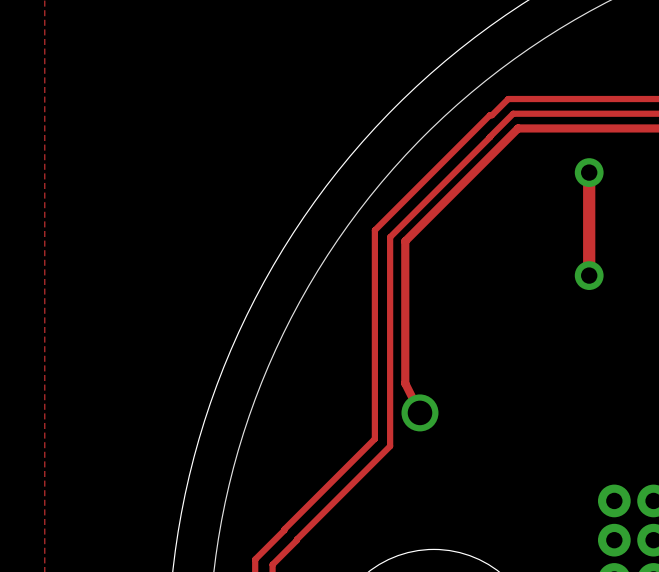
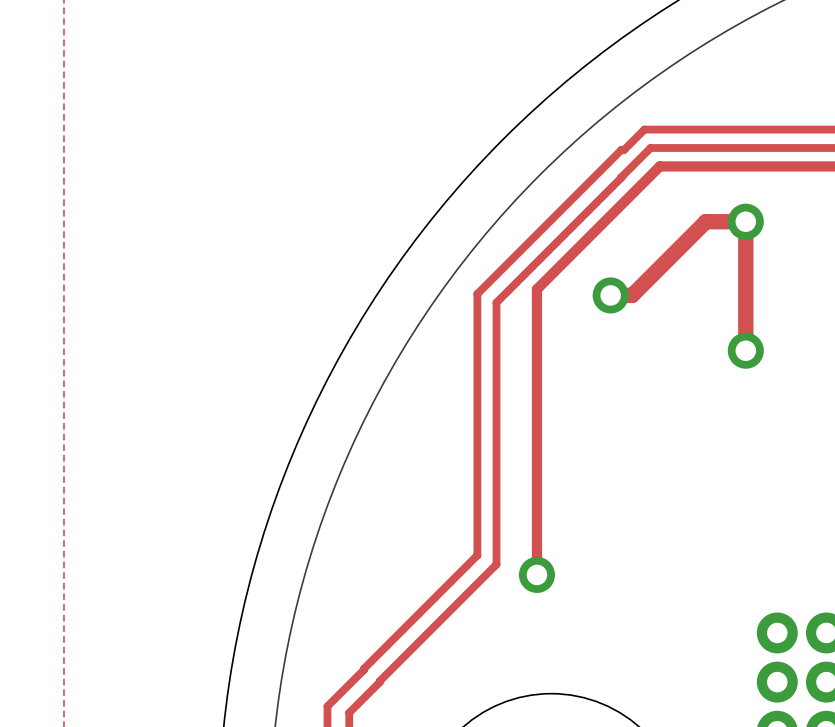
track: (520, 128) (518, 128) (405, 241) (405, 383) (419, 412) -> (659, 166) (536, 289) (536, 574)
track: none -> (745, 221) (705, 221) (632, 295) (610, 295)
via: none -> (610, 295)
via: (419, 412) -> none
via: none -> (536, 574)

